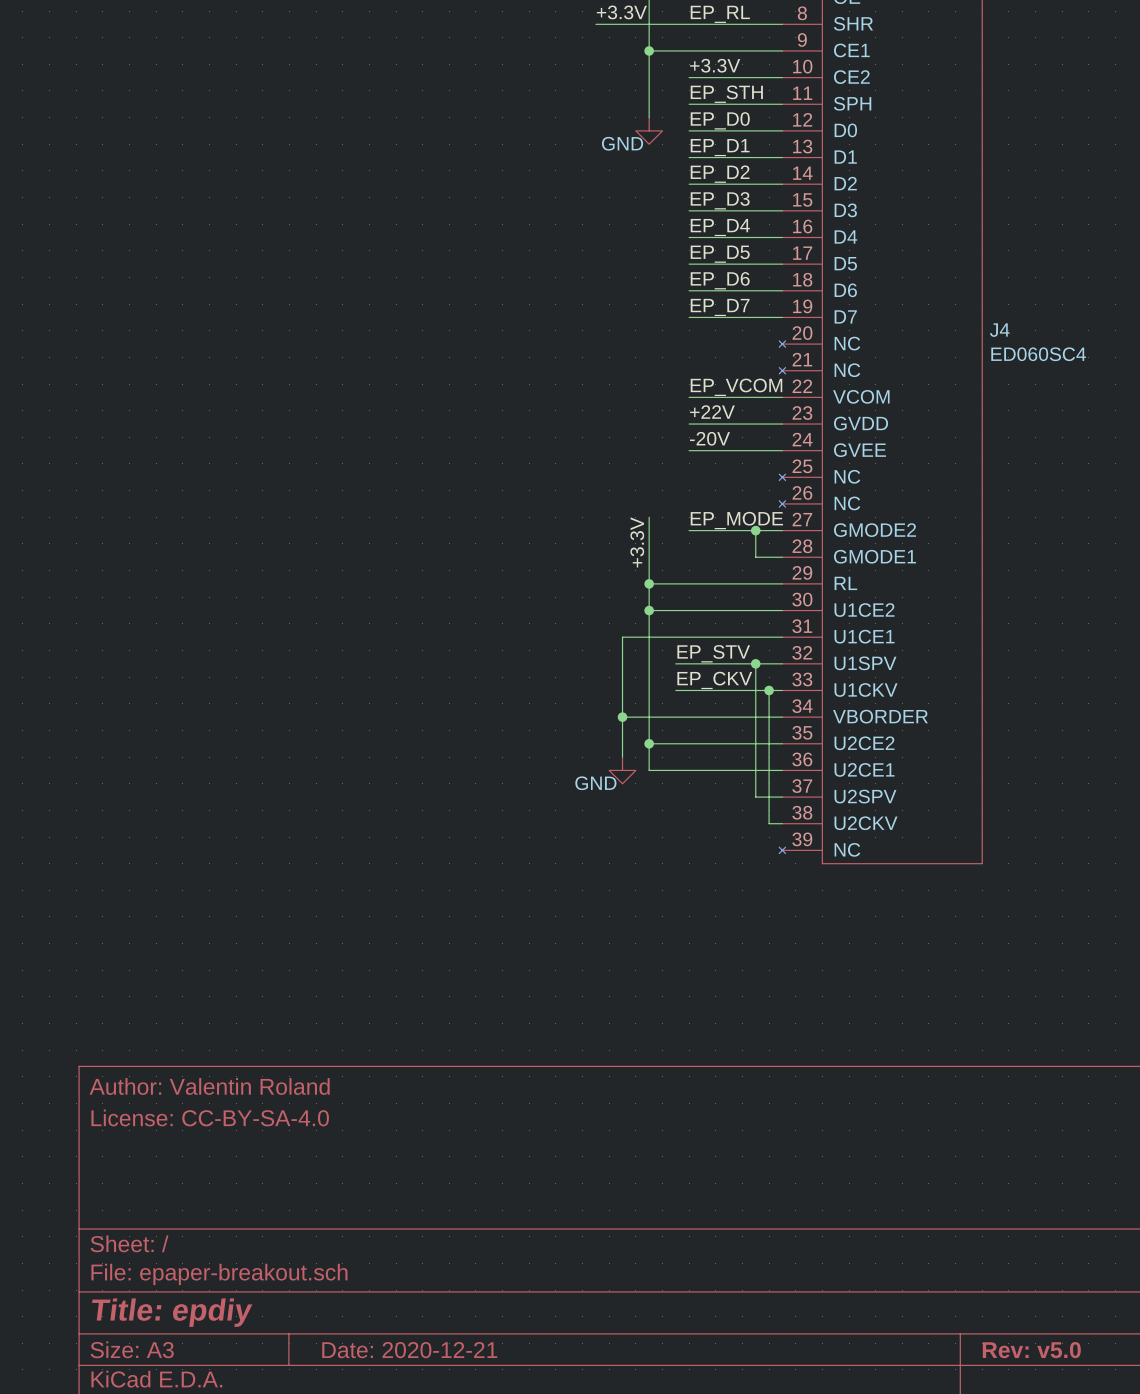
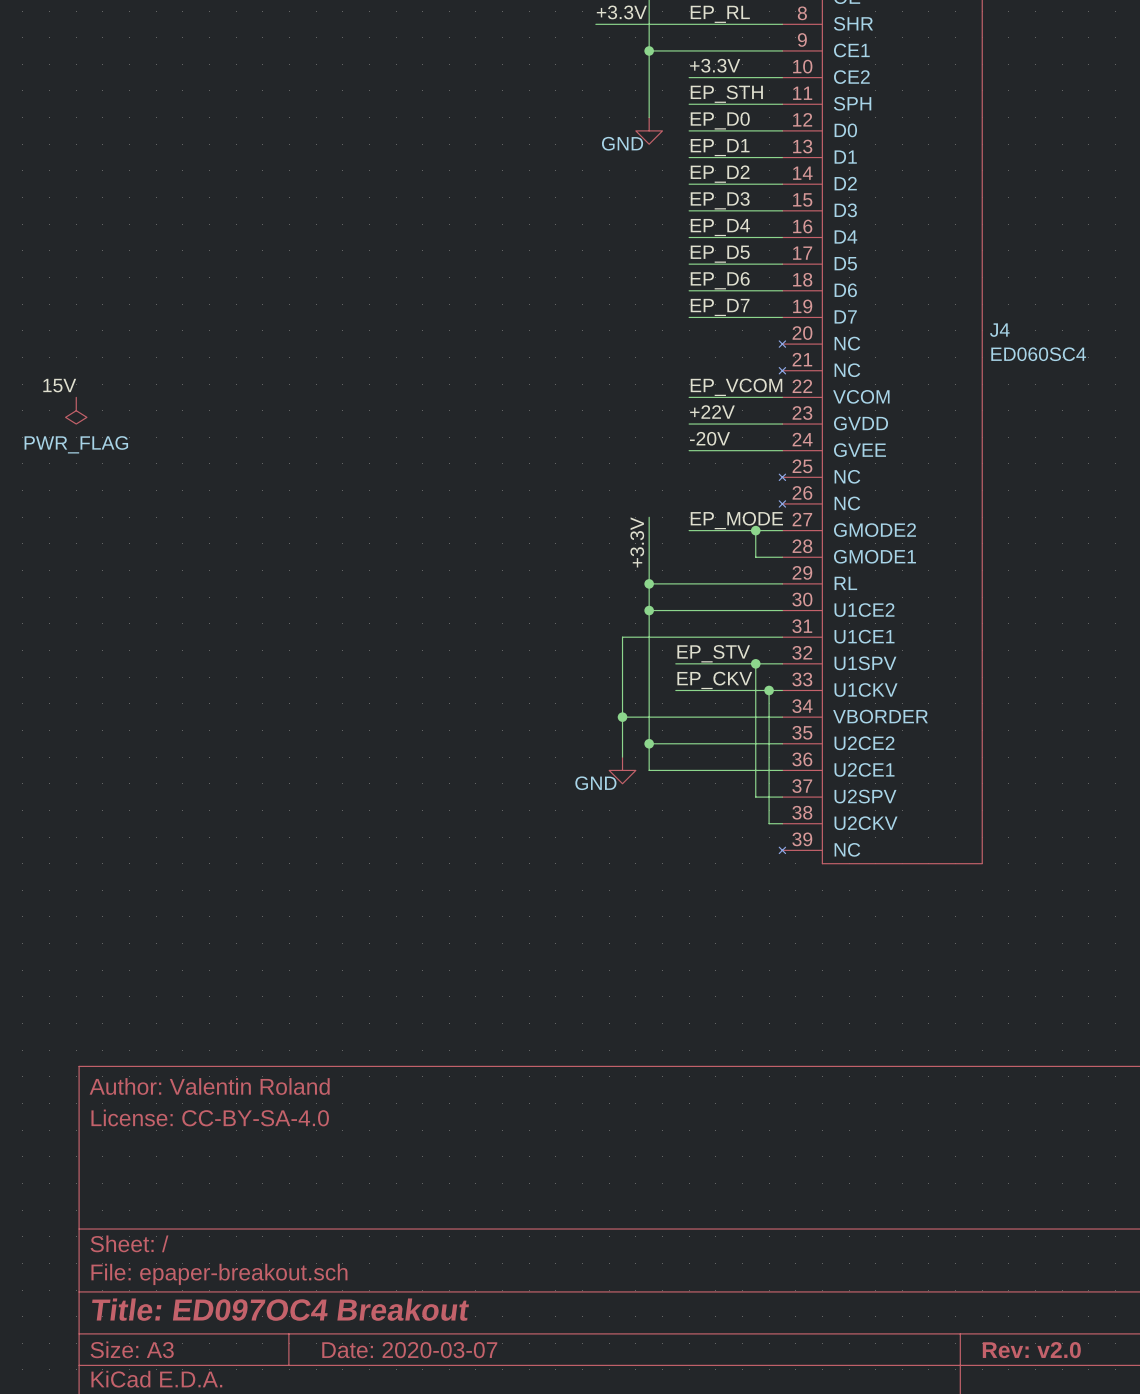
label: none -> 15V (59, 385)
power symbol: none -> PWR_FLAG (76, 410)
title block: Title: epdiy (172, 1312) -> Title: ED097OC4 Breakout (280, 1309)
title block: Date: 2020-12-21 (409, 1350) -> Date: 2020-03-07 (409, 1350)
title block: Rev: v5.0 (1031, 1350) -> Rev: v2.0 (1031, 1350)

